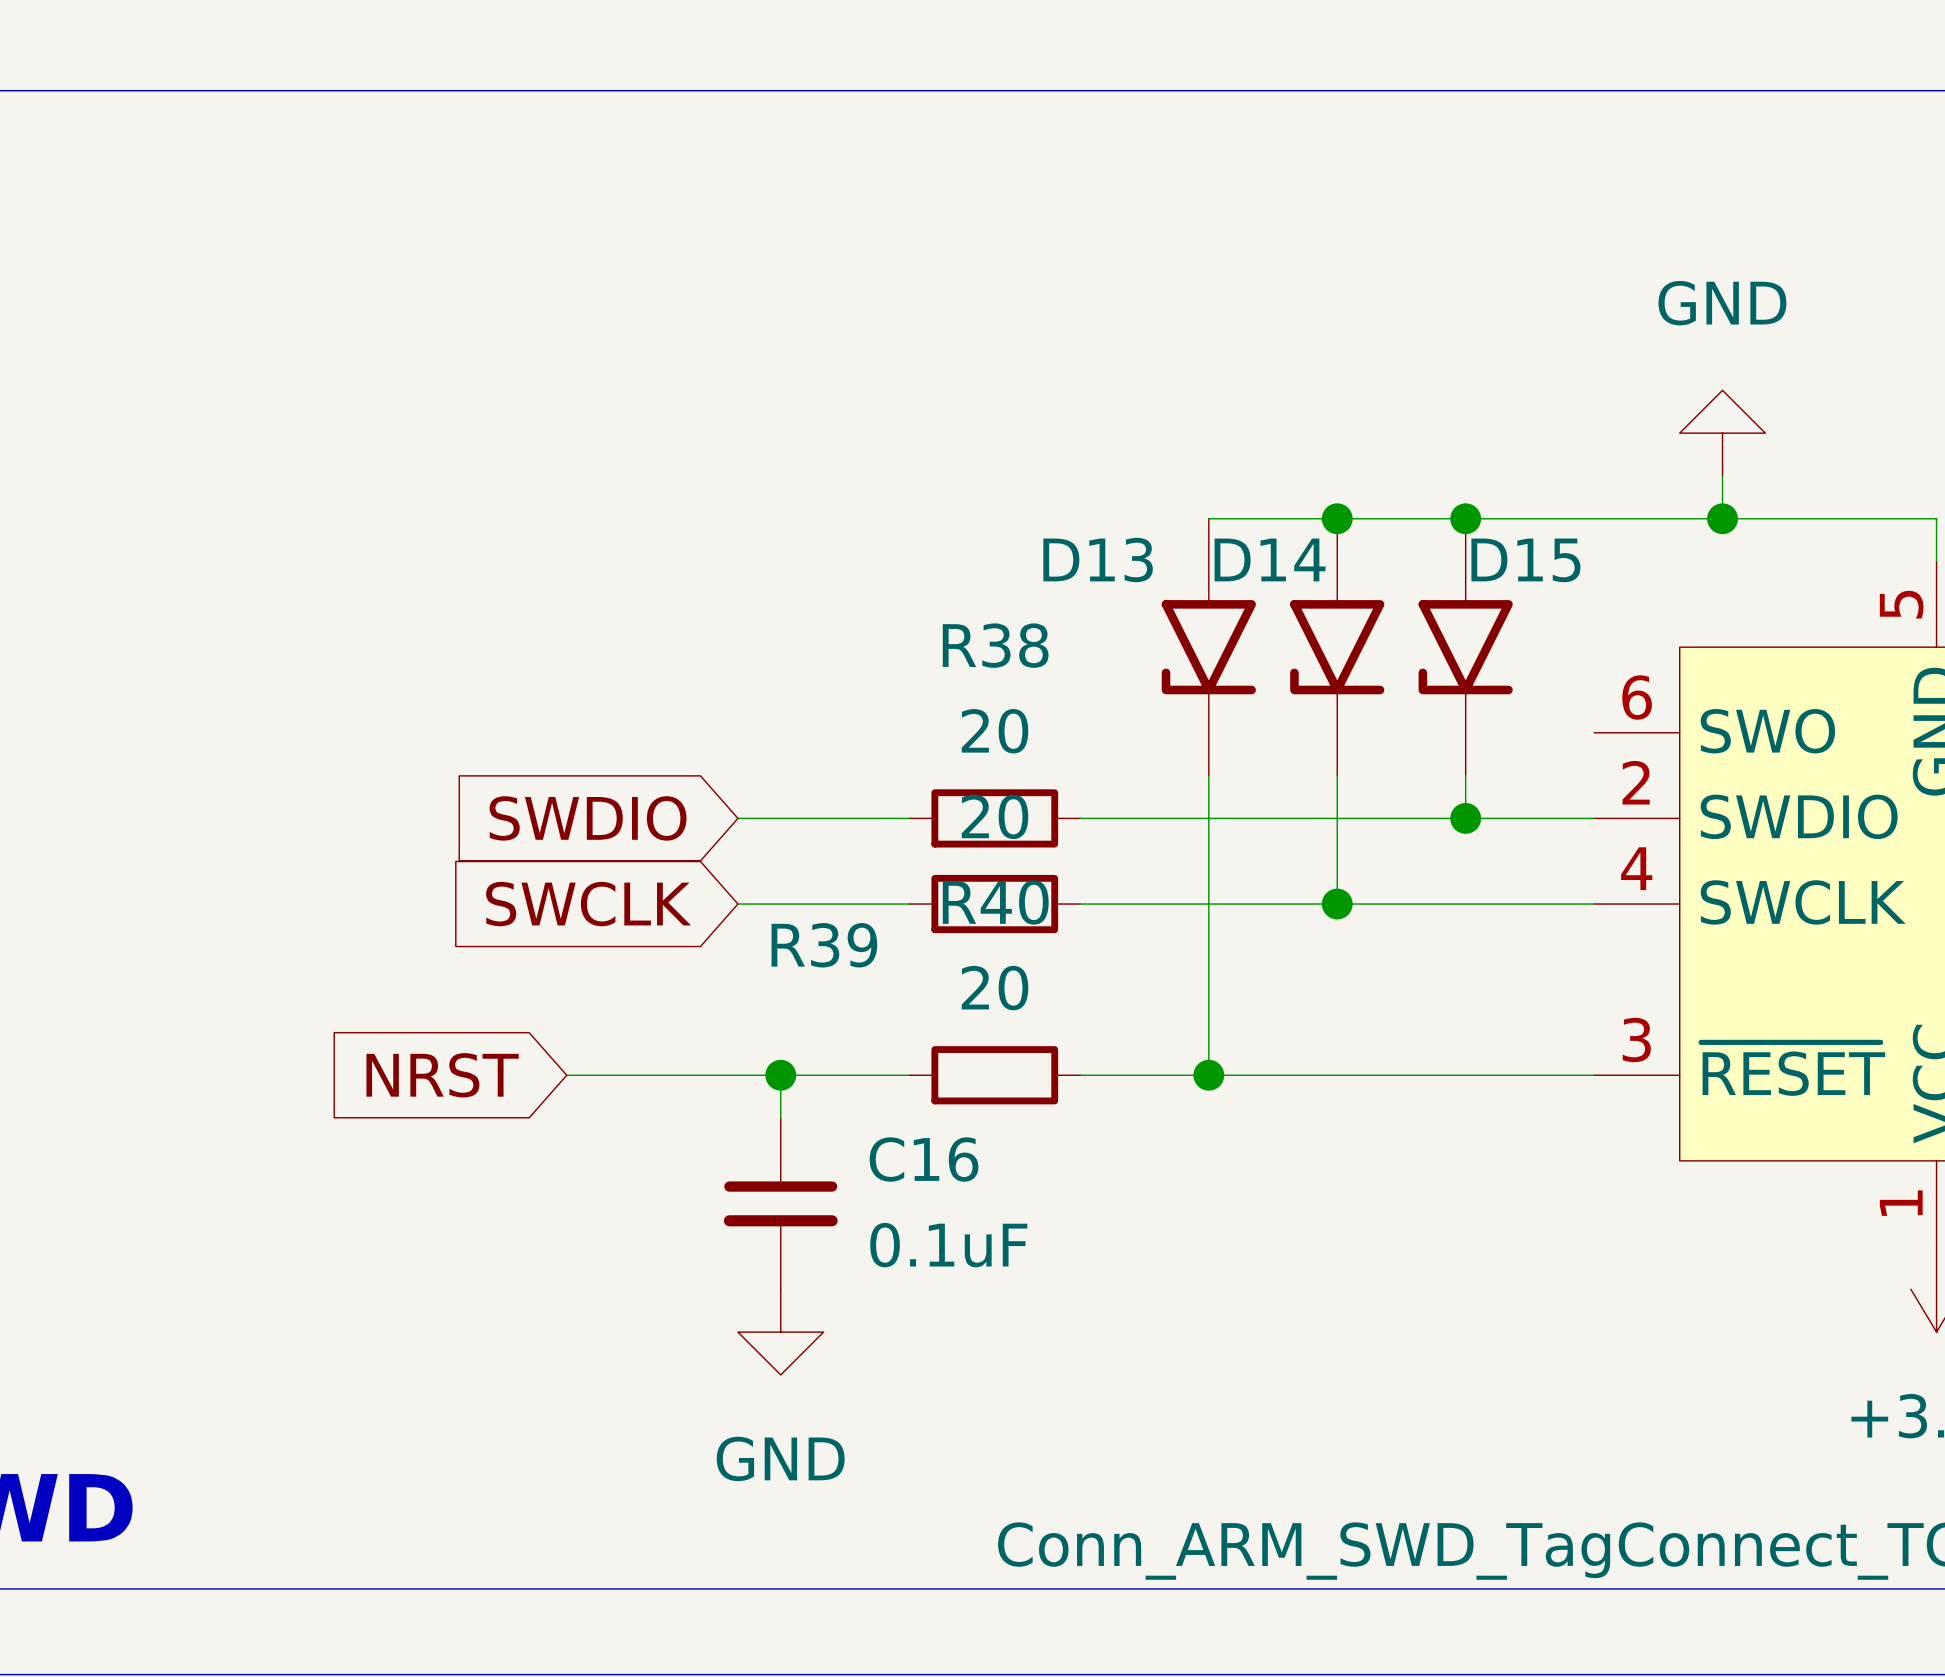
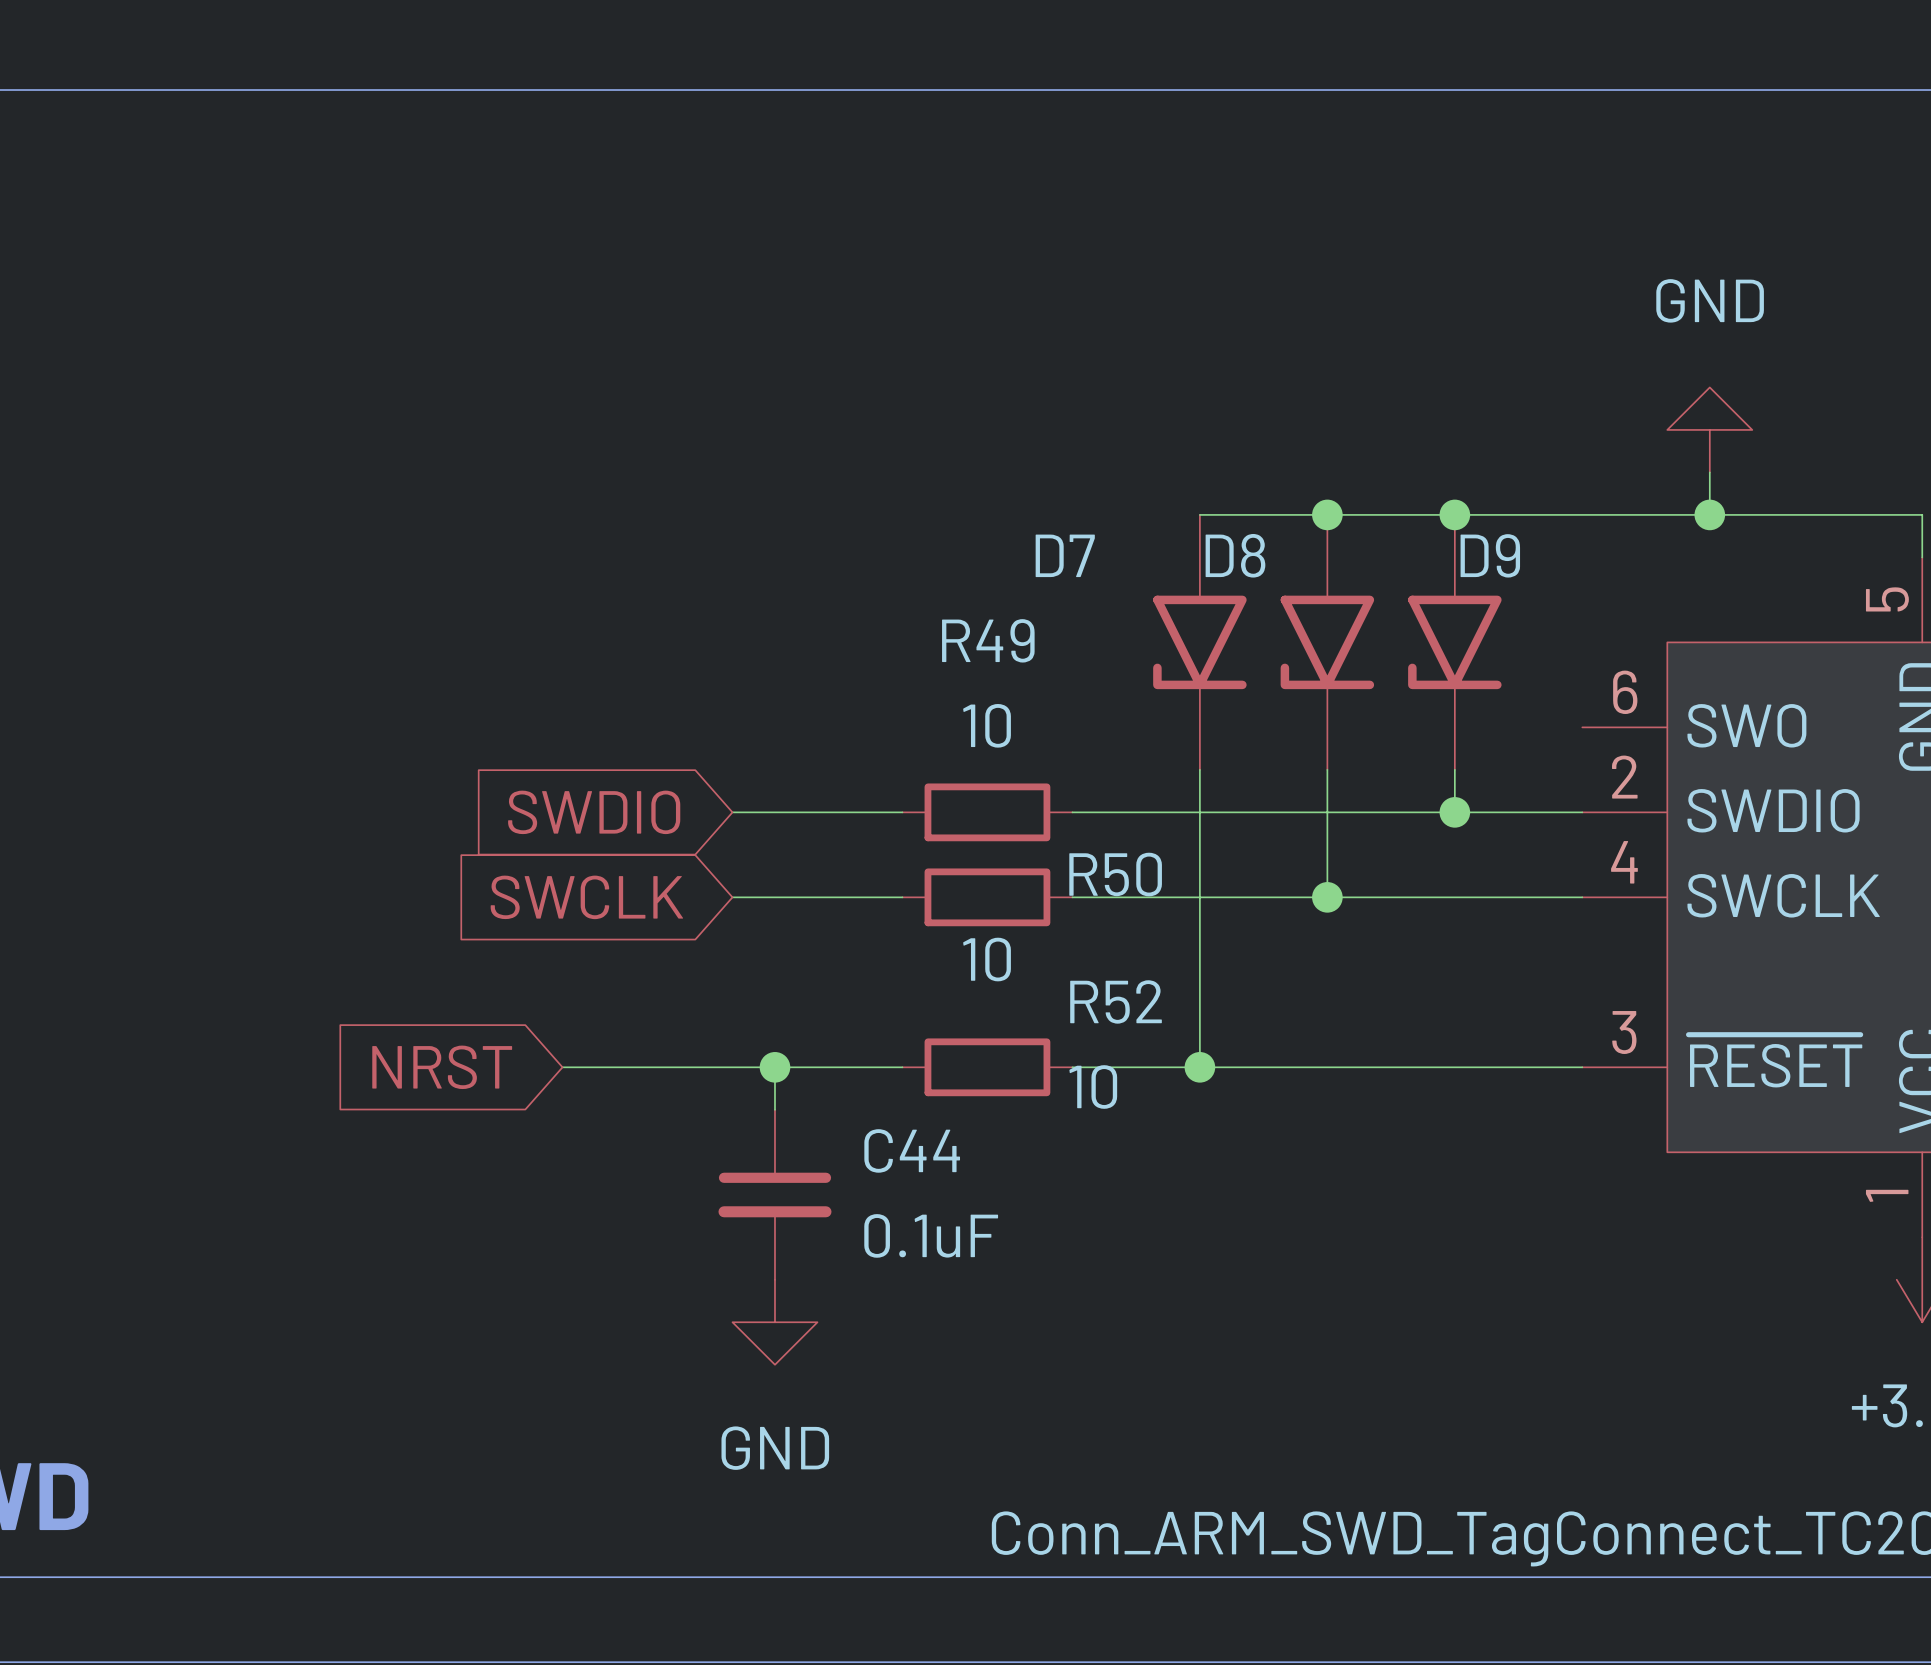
D13 name: D13 (1098, 559) -> D7 (1065, 555)
D14 name: D14 (1270, 559) -> D8 (1235, 555)
D15 name: D15 (1525, 560) -> D9 (1490, 555)
R38 name: R38 (995, 645) -> R49 (988, 640)
R38 value: 20 (994, 731) -> 10 (987, 725)
R39 value: 20 (994, 816) -> 10 (987, 959)
R40 name: R40 (995, 902) -> R52 (1116, 1001)
R39 name: R39 (824, 945) -> R50 (1115, 874)
R40 value: 20 (994, 988) -> 10 (1093, 1087)
C16 name: C16 (924, 1159) -> C44 (912, 1150)

